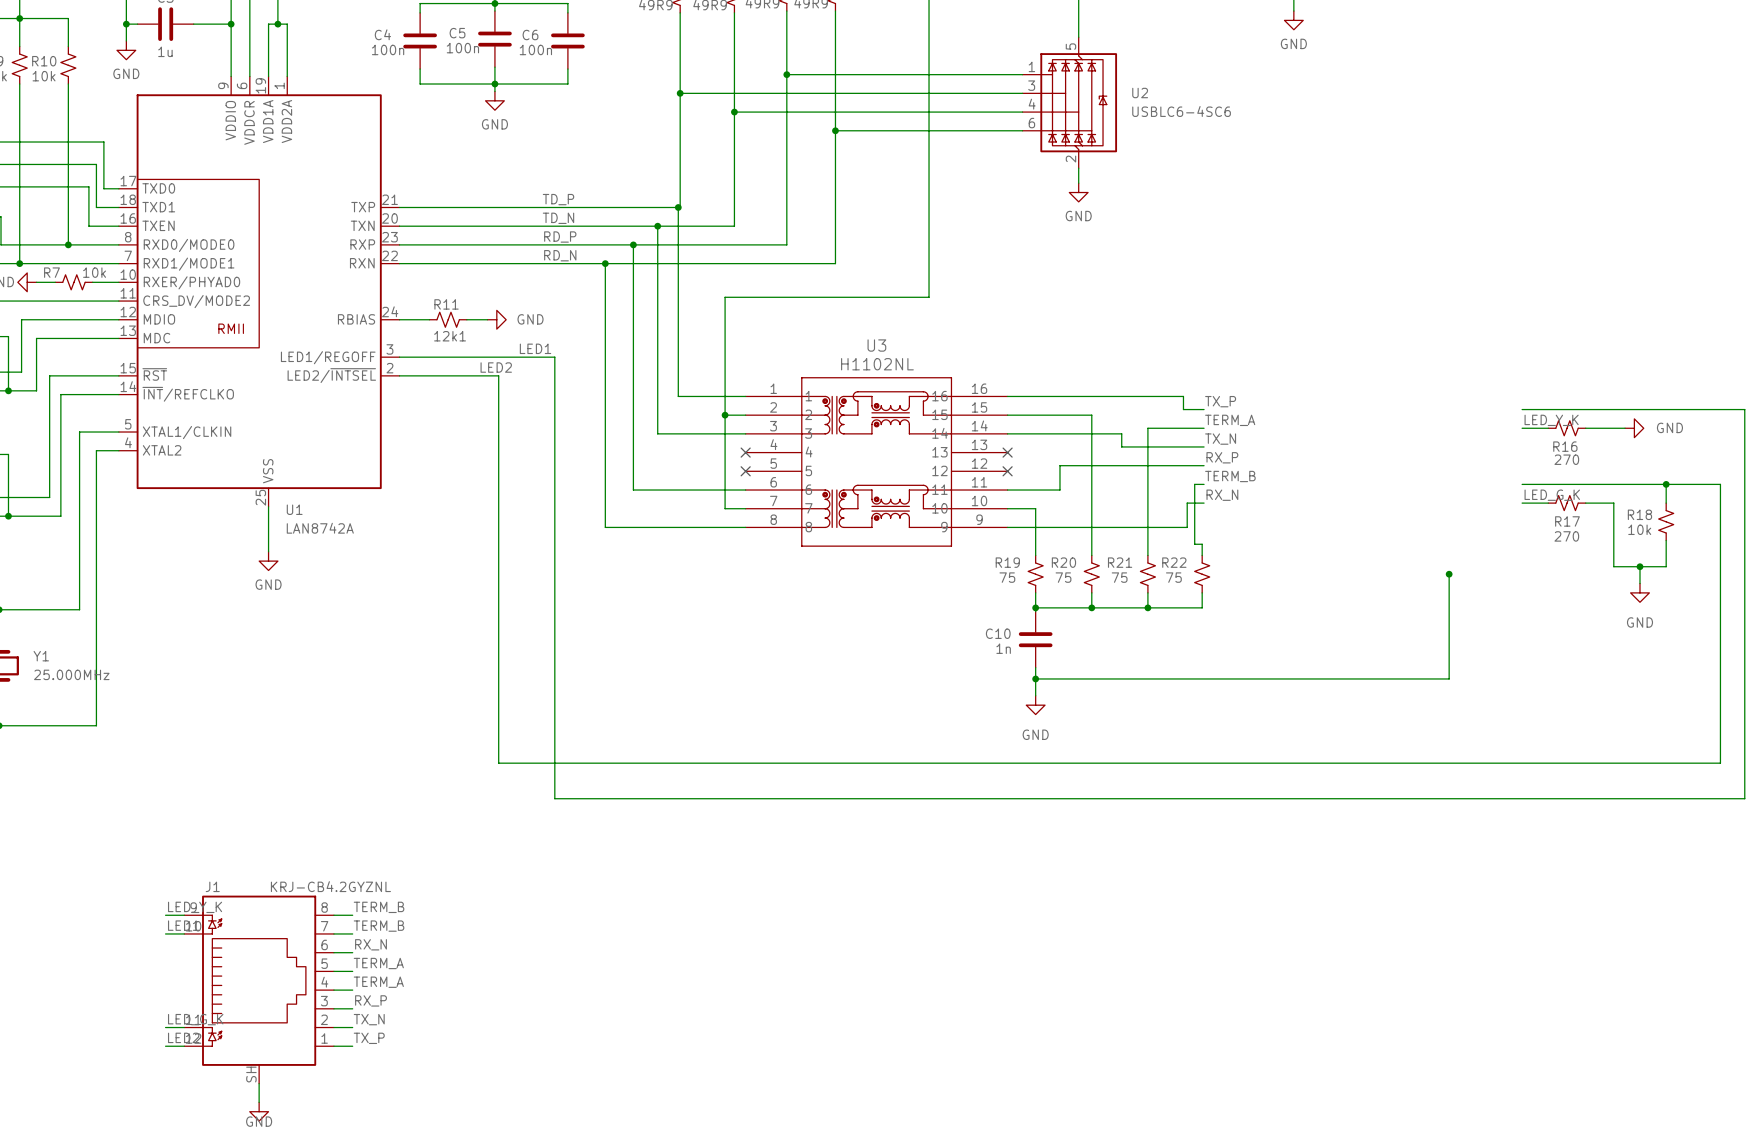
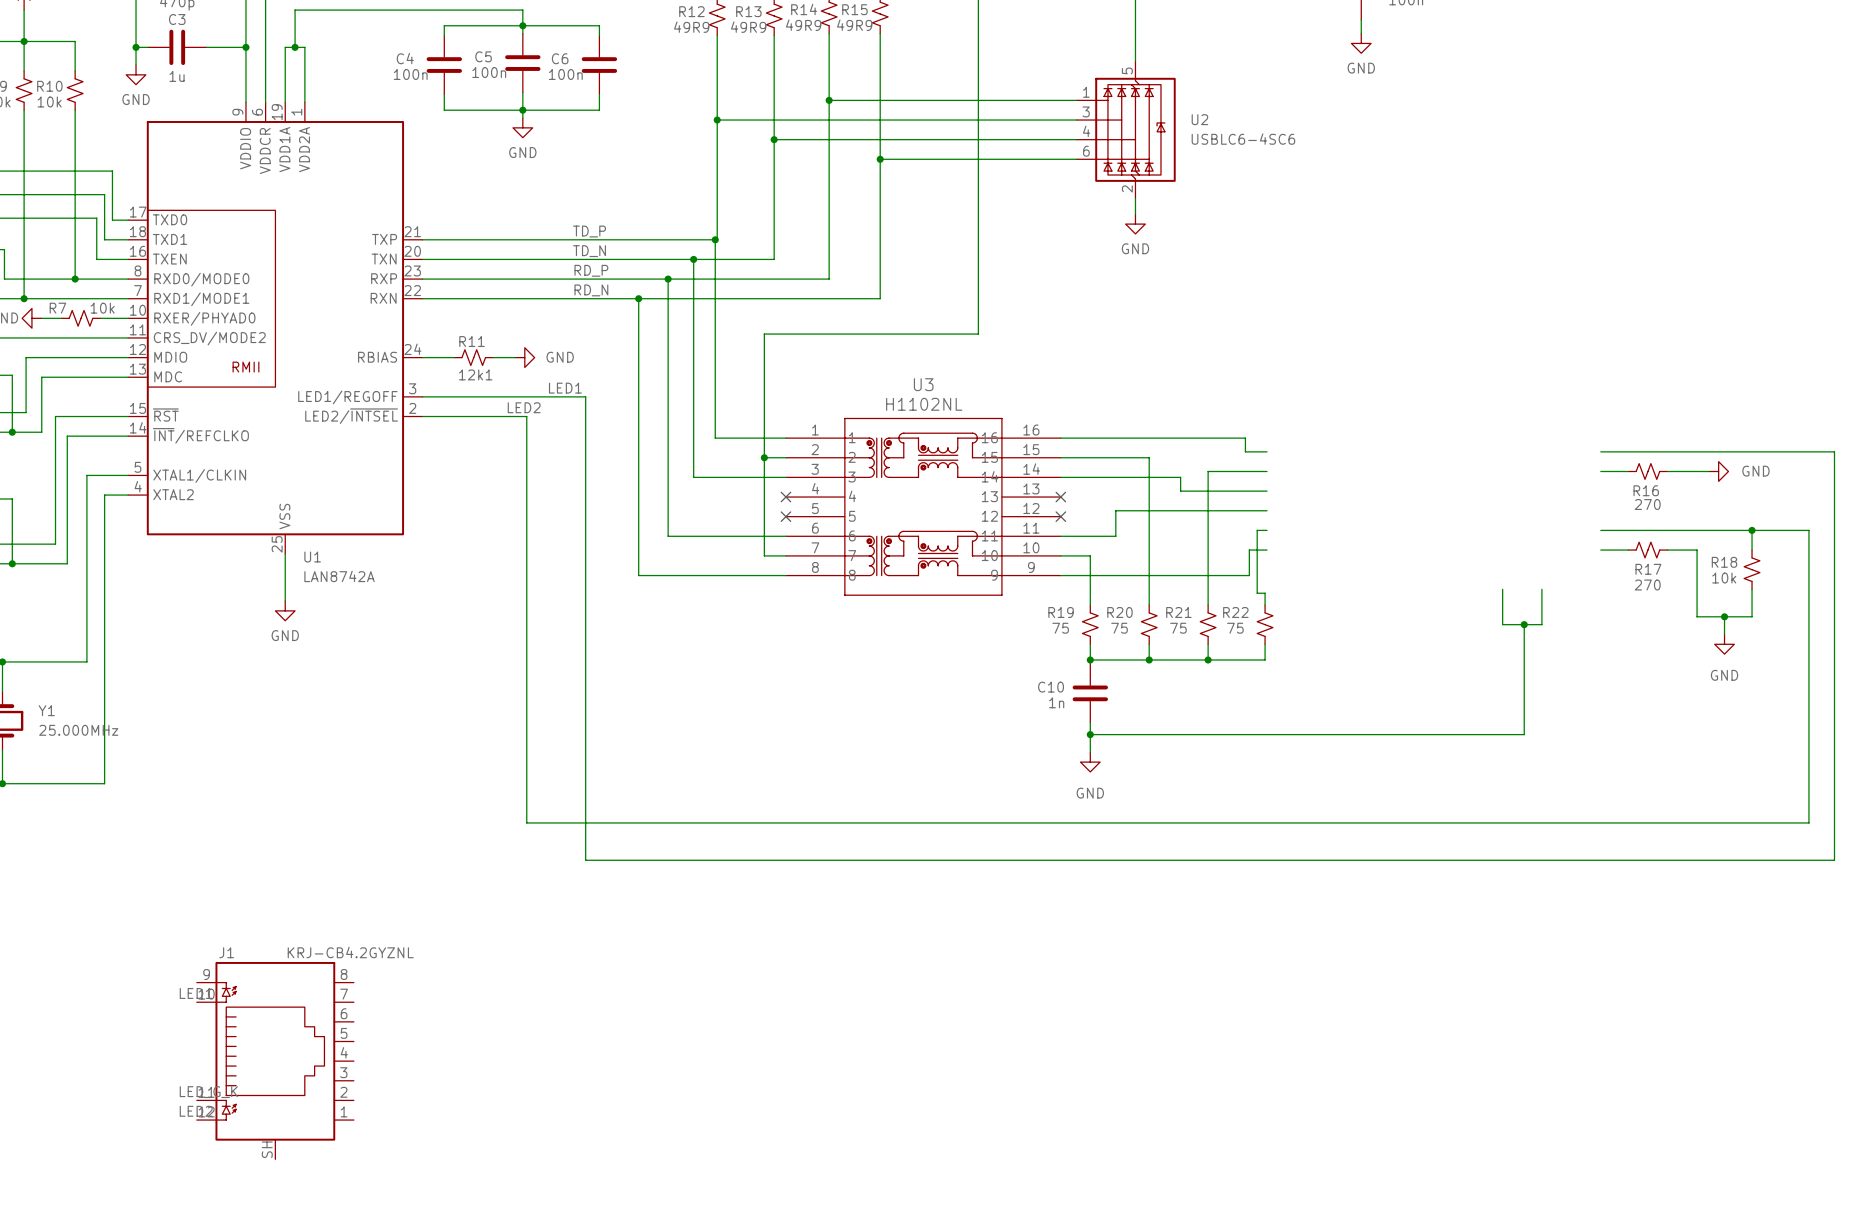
label: TX_P (1220, 401) -> none
label: TERM_A (1230, 420) -> none
label: LED_Y_K (1551, 420) -> none
label: TX_N (1220, 439) -> none
label: RX_P (1222, 457) -> none
label: TERM_B (1230, 476) -> none
label: RX_N (1222, 495) -> none
label: LED_G_K (1552, 495) -> none
wire: none -> (1502, 589) (1502, 624) (1541, 624) (1541, 589)
label: LED_Y_K (195, 907) -> none
label: TERM_B (379, 907) -> none
wire: (165, 915) (184, 915) -> none
wire: (333, 915) (352, 915) -> none
label: TERM_B (379, 926) -> none
wire: (165, 933) (184, 933) -> none
wire: (333, 933) (352, 933) -> none
label: RX_N (371, 944) -> none
wire: (333, 952) (352, 952) -> none
label: TERM_A (378, 963) -> none
wire: (333, 971) (352, 971) -> none
label: TERM_A (378, 982) -> none
wire: (333, 990) (352, 990) -> none
label: RX_P (371, 1000) -> none
wire: (333, 1008) (352, 1008) -> none
label: TX_N (369, 1019) -> none
wire: (165, 1027) (184, 1027) -> none
wire: (333, 1027) (352, 1027) -> none
label: TX_P (369, 1038) -> none
wire: (165, 1046) (184, 1046) -> none
wire: (333, 1046) (352, 1046) -> none
wire: (259, 1083) (259, 1102) -> none
power symbol: GND (259, 1111) -> none

